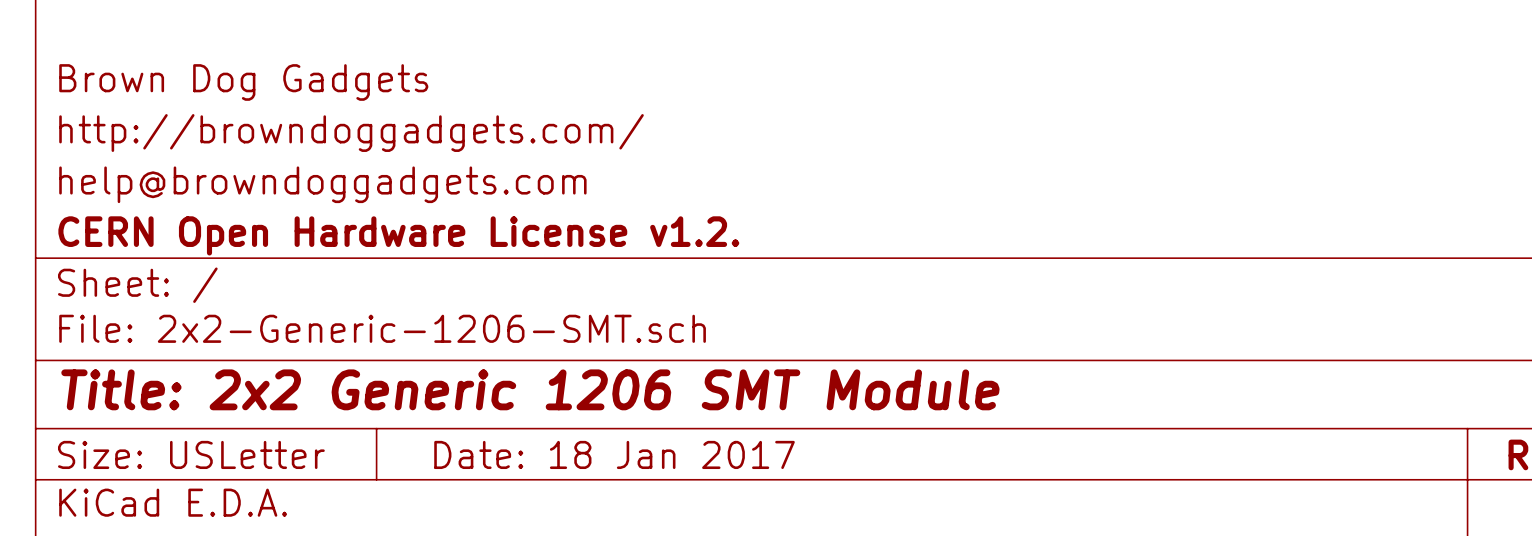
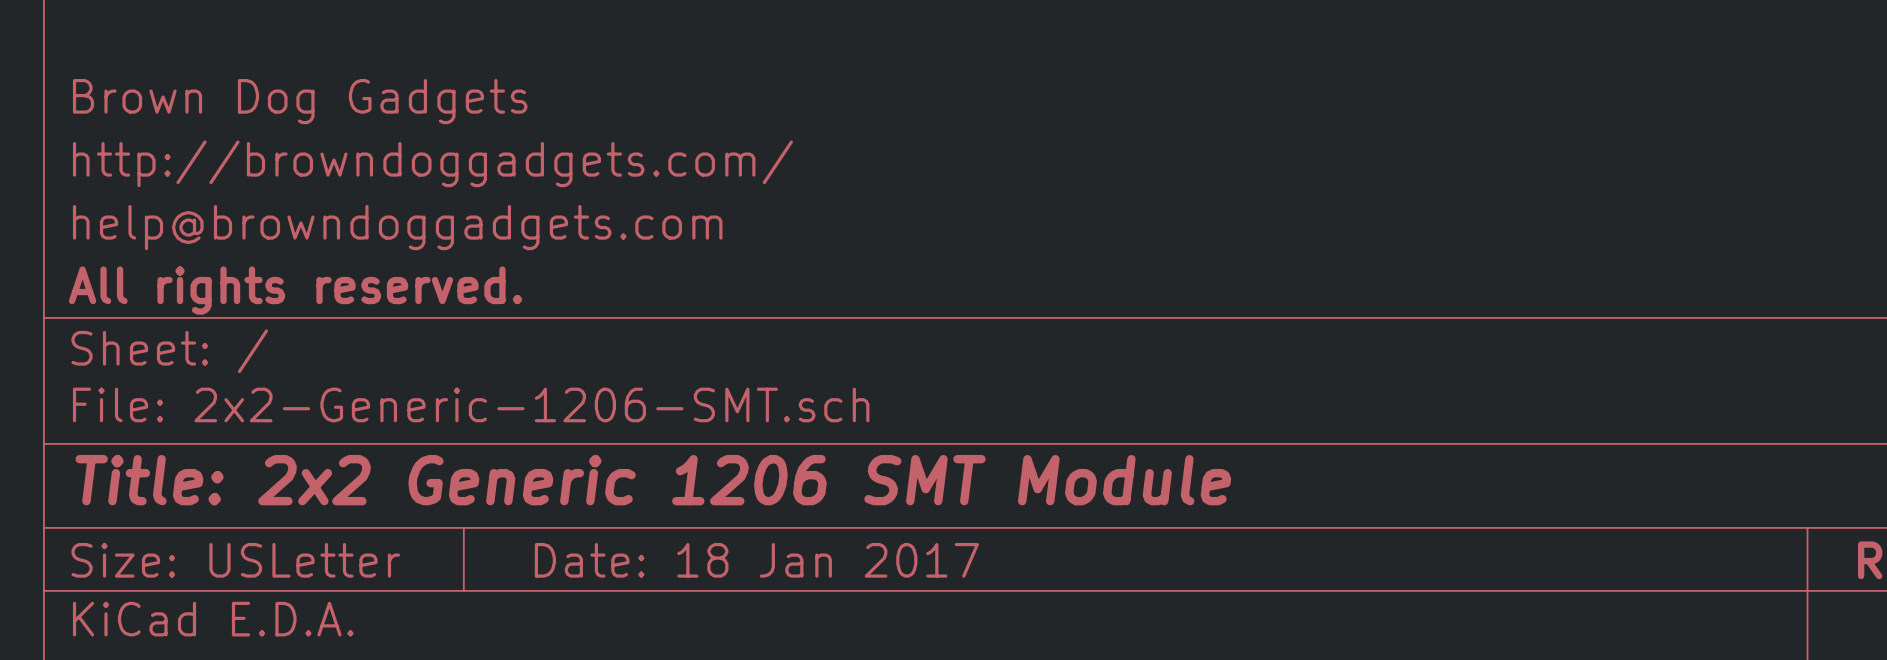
title block: CERN Open Hardware License v1.2. (398, 235) -> All rights reserved. (295, 290)

